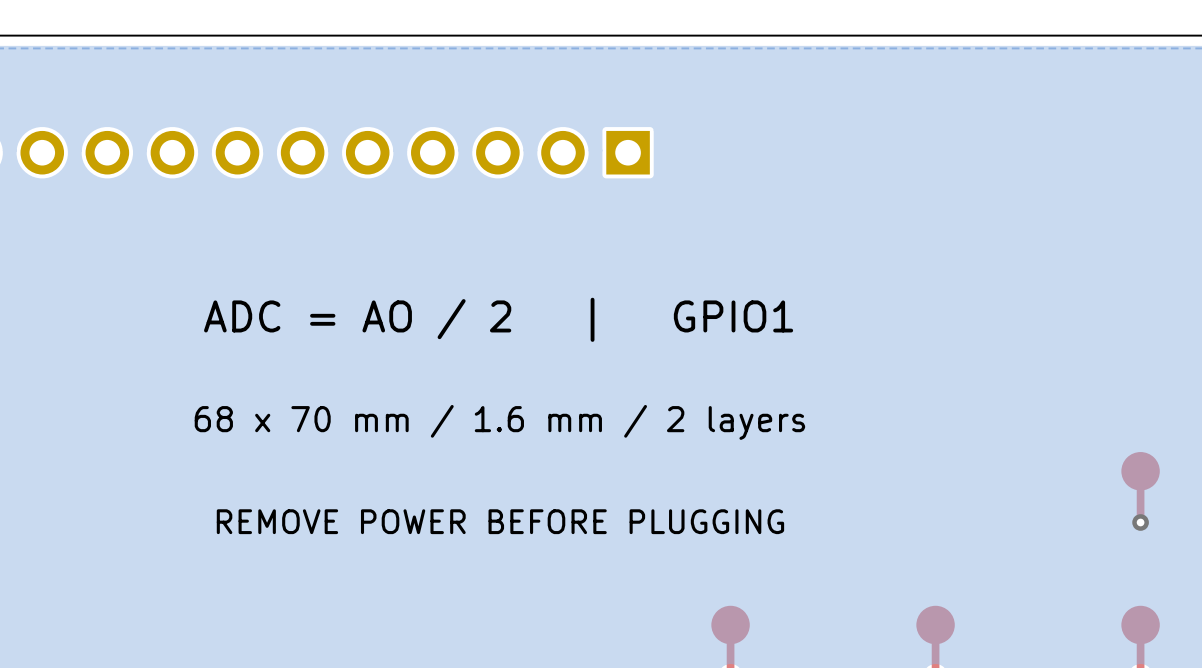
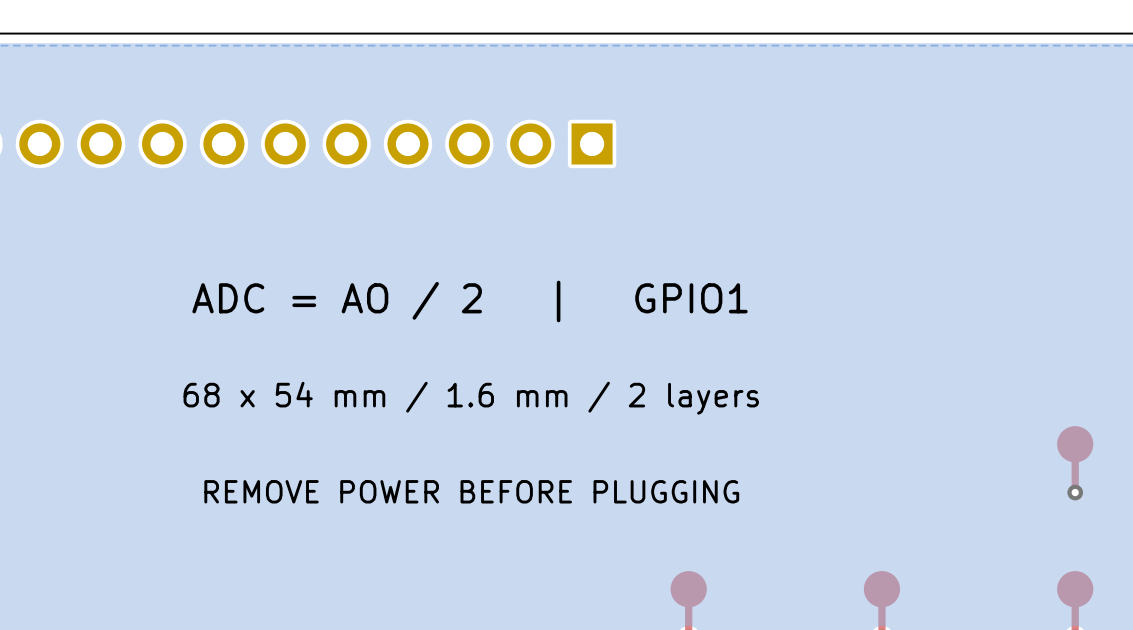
text: 68 x 70 mm / 1.6 mm / 2 layers (499, 422) -> 68 x 54 mm / 1.6 mm / 2 layers (471, 398)

